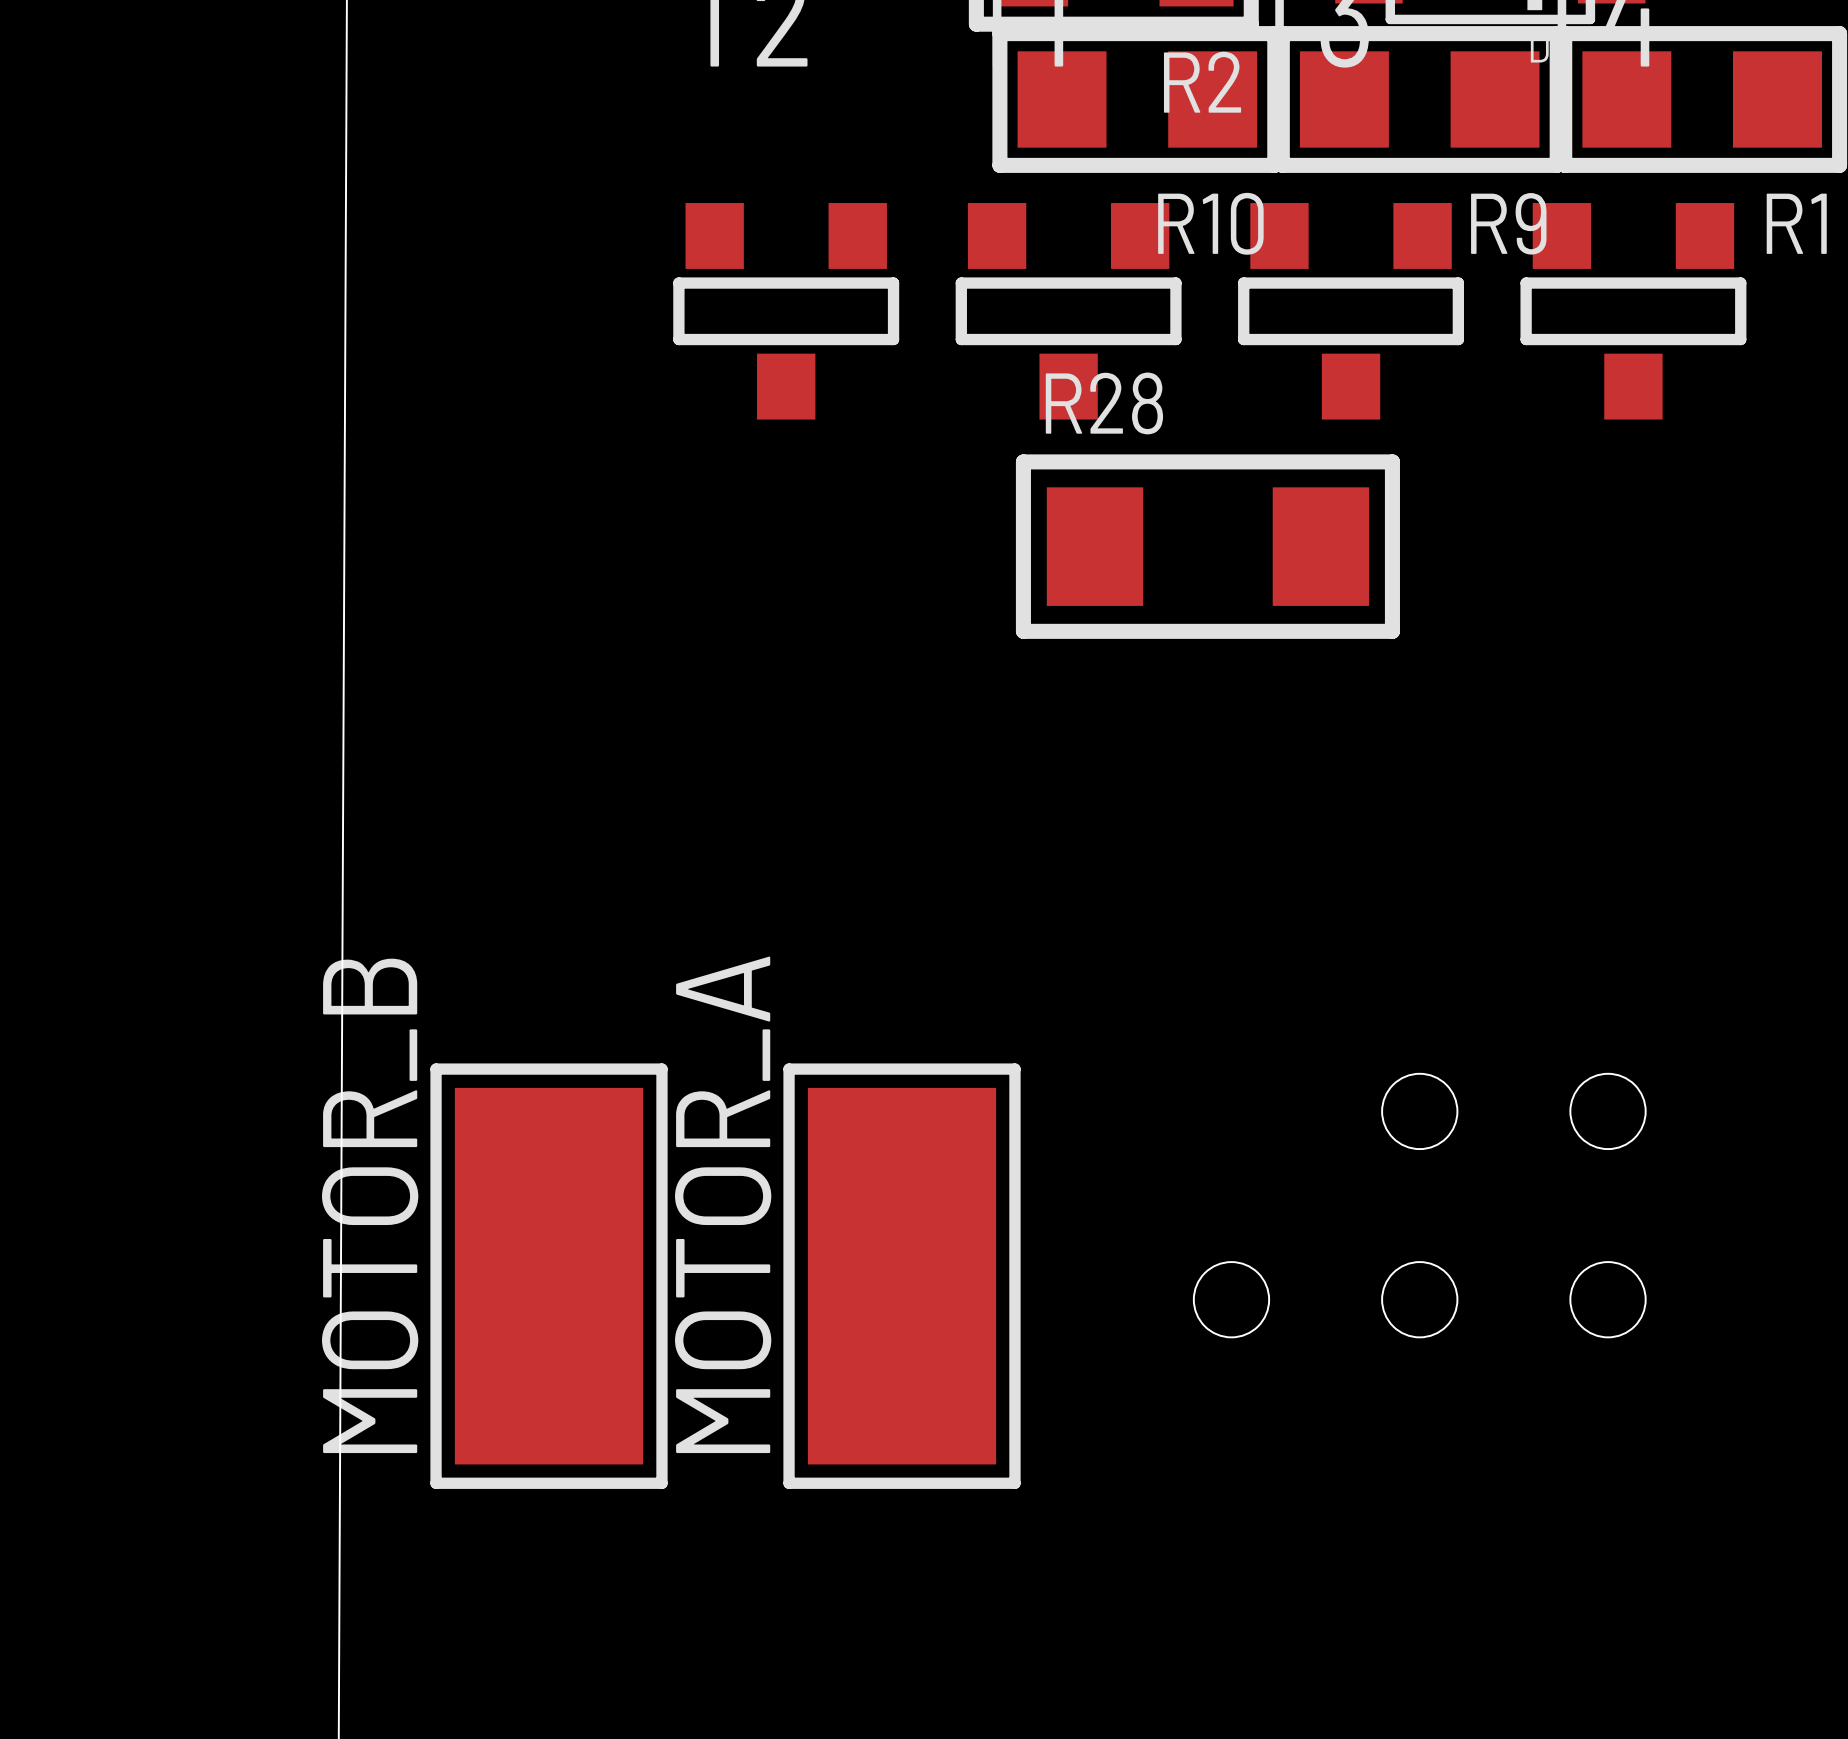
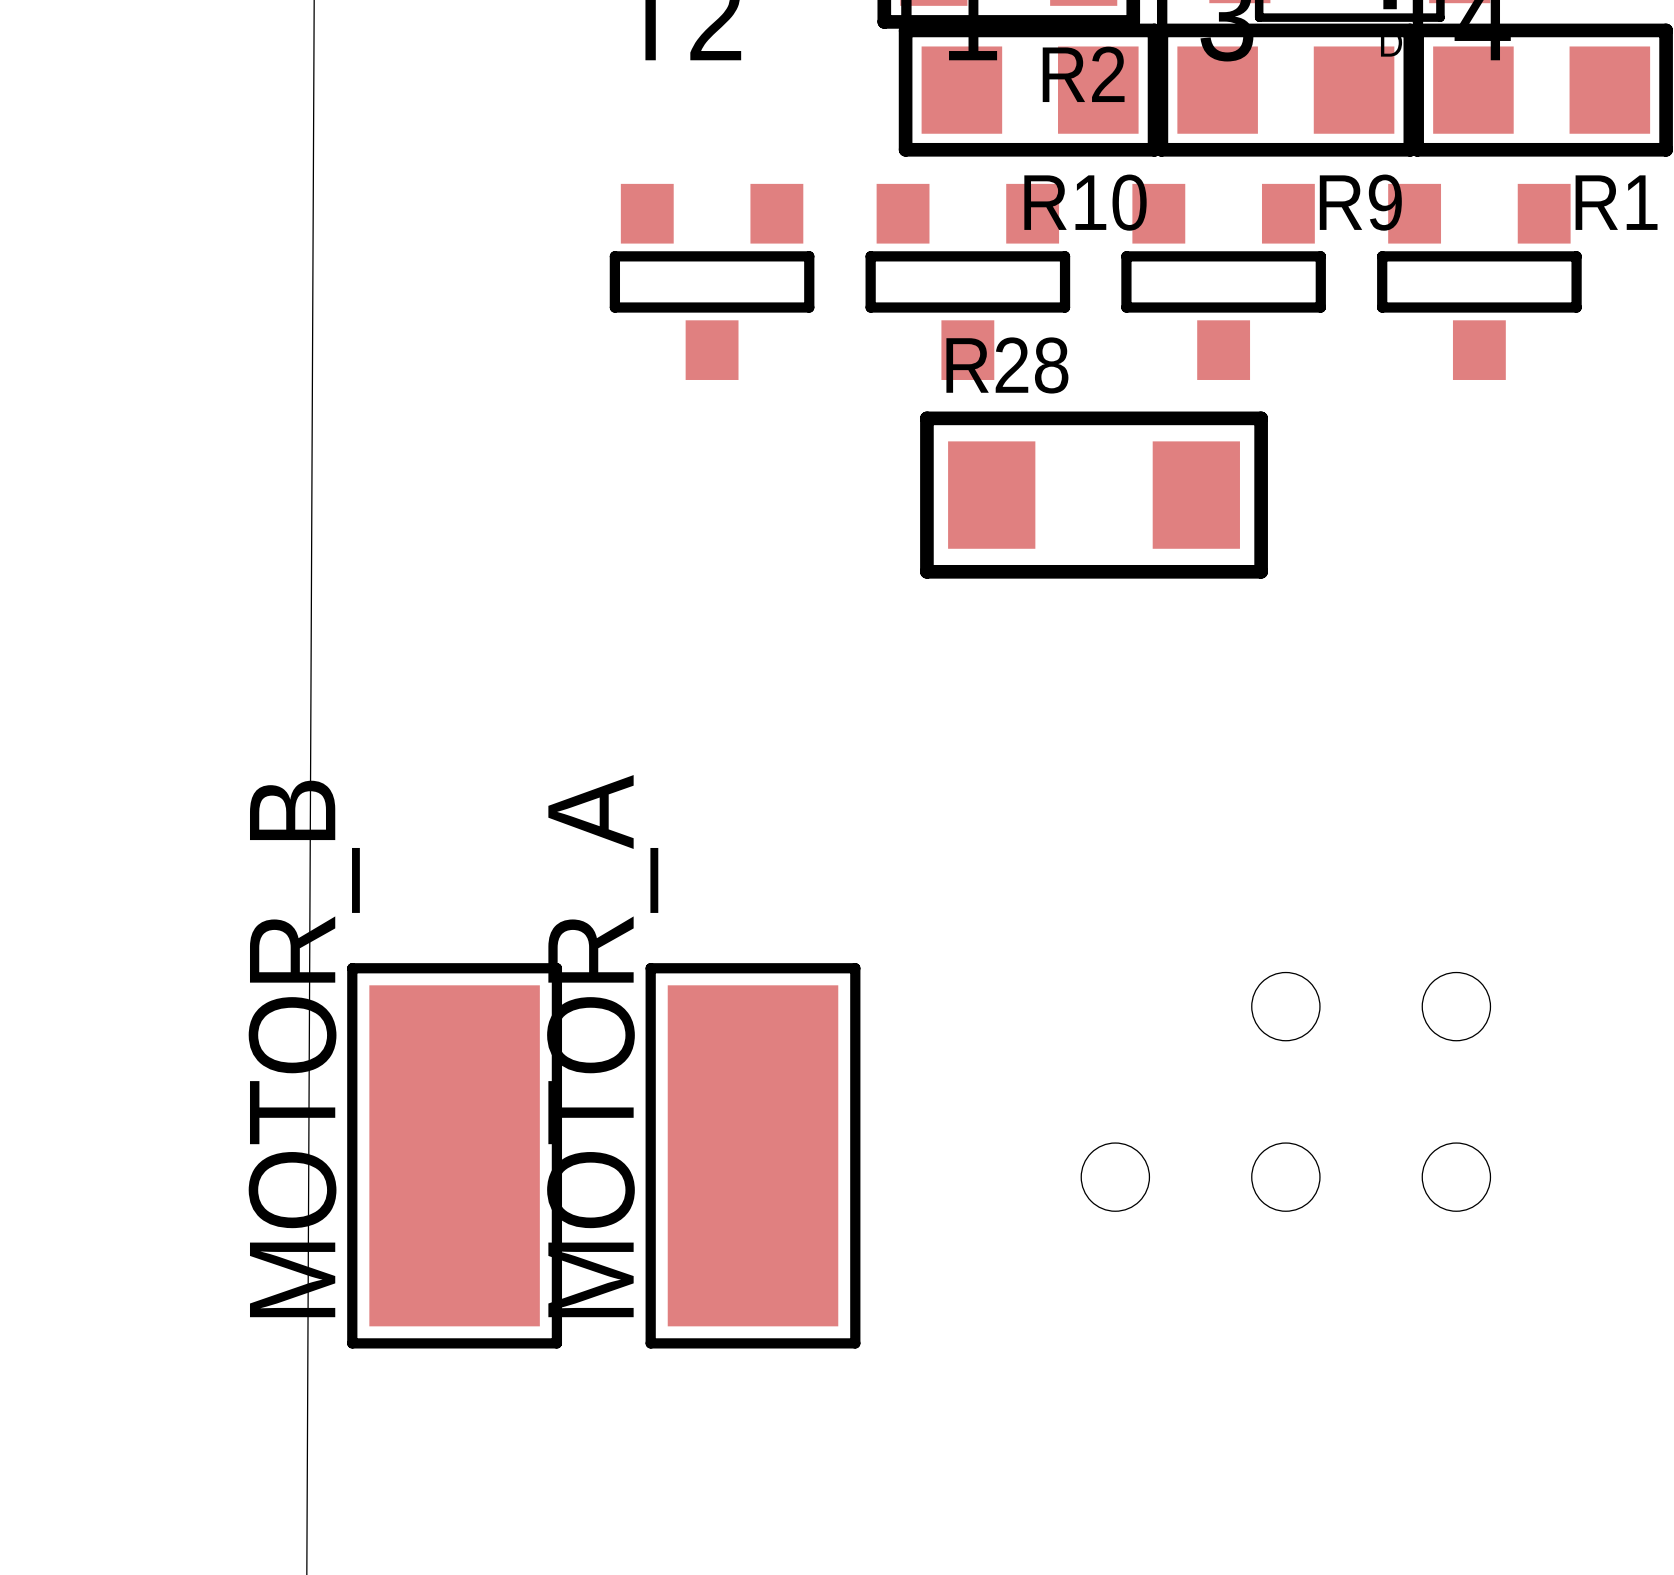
MOTOR_B position: (549, 1276) -> (454, 1155)
MOTOR_A position: (902, 1276) -> (753, 1155)

